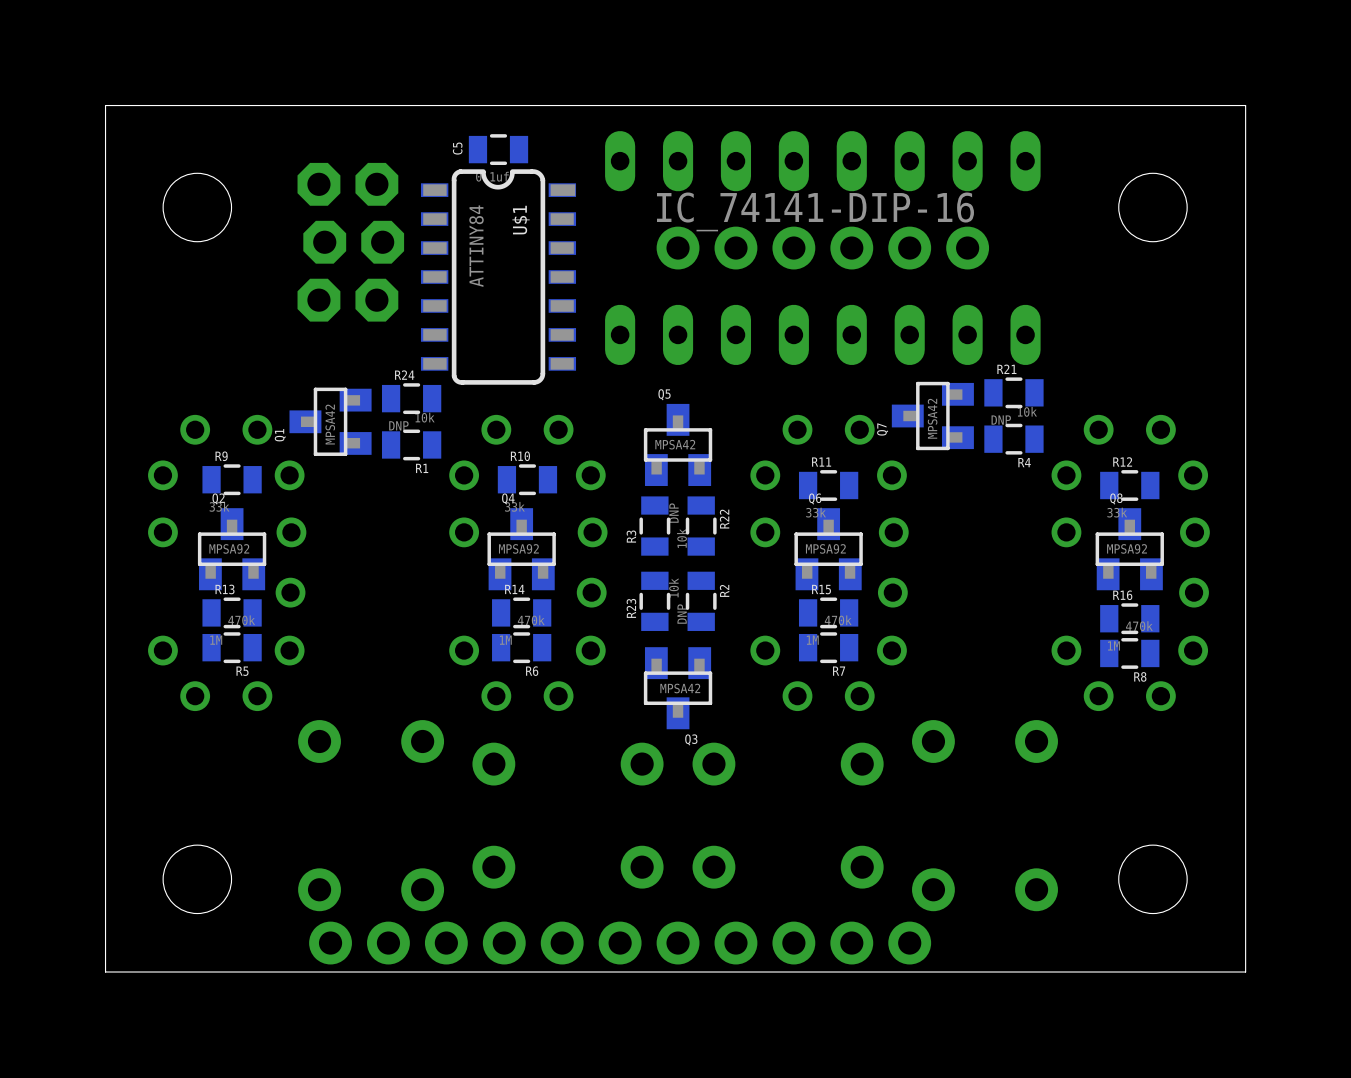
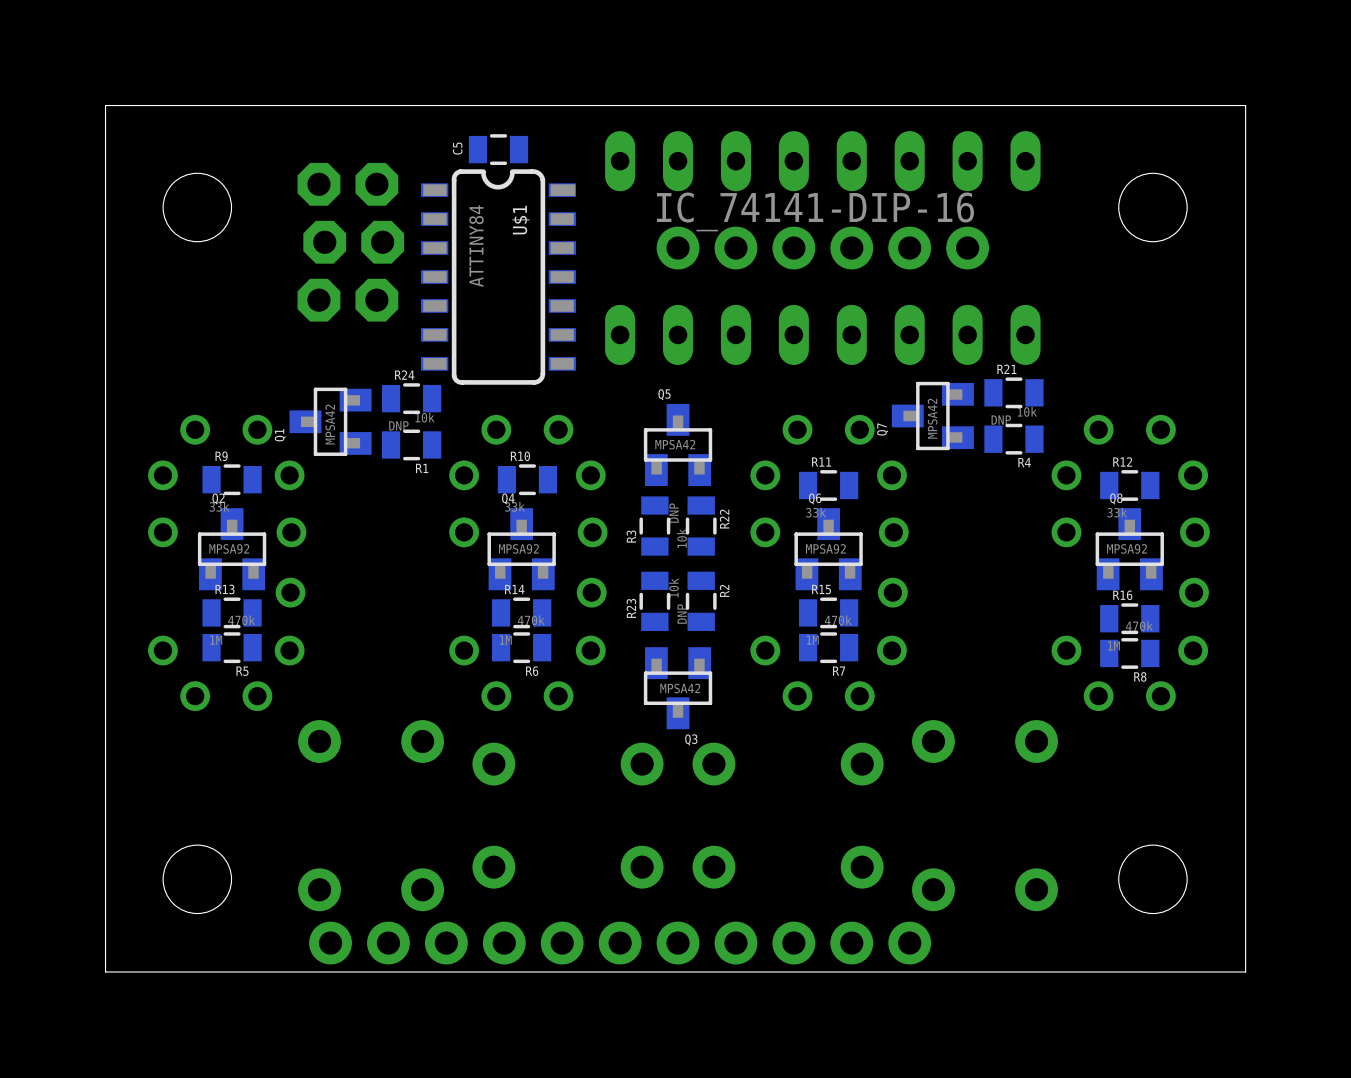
C5 value: 0.1uf (492, 176) -> none

